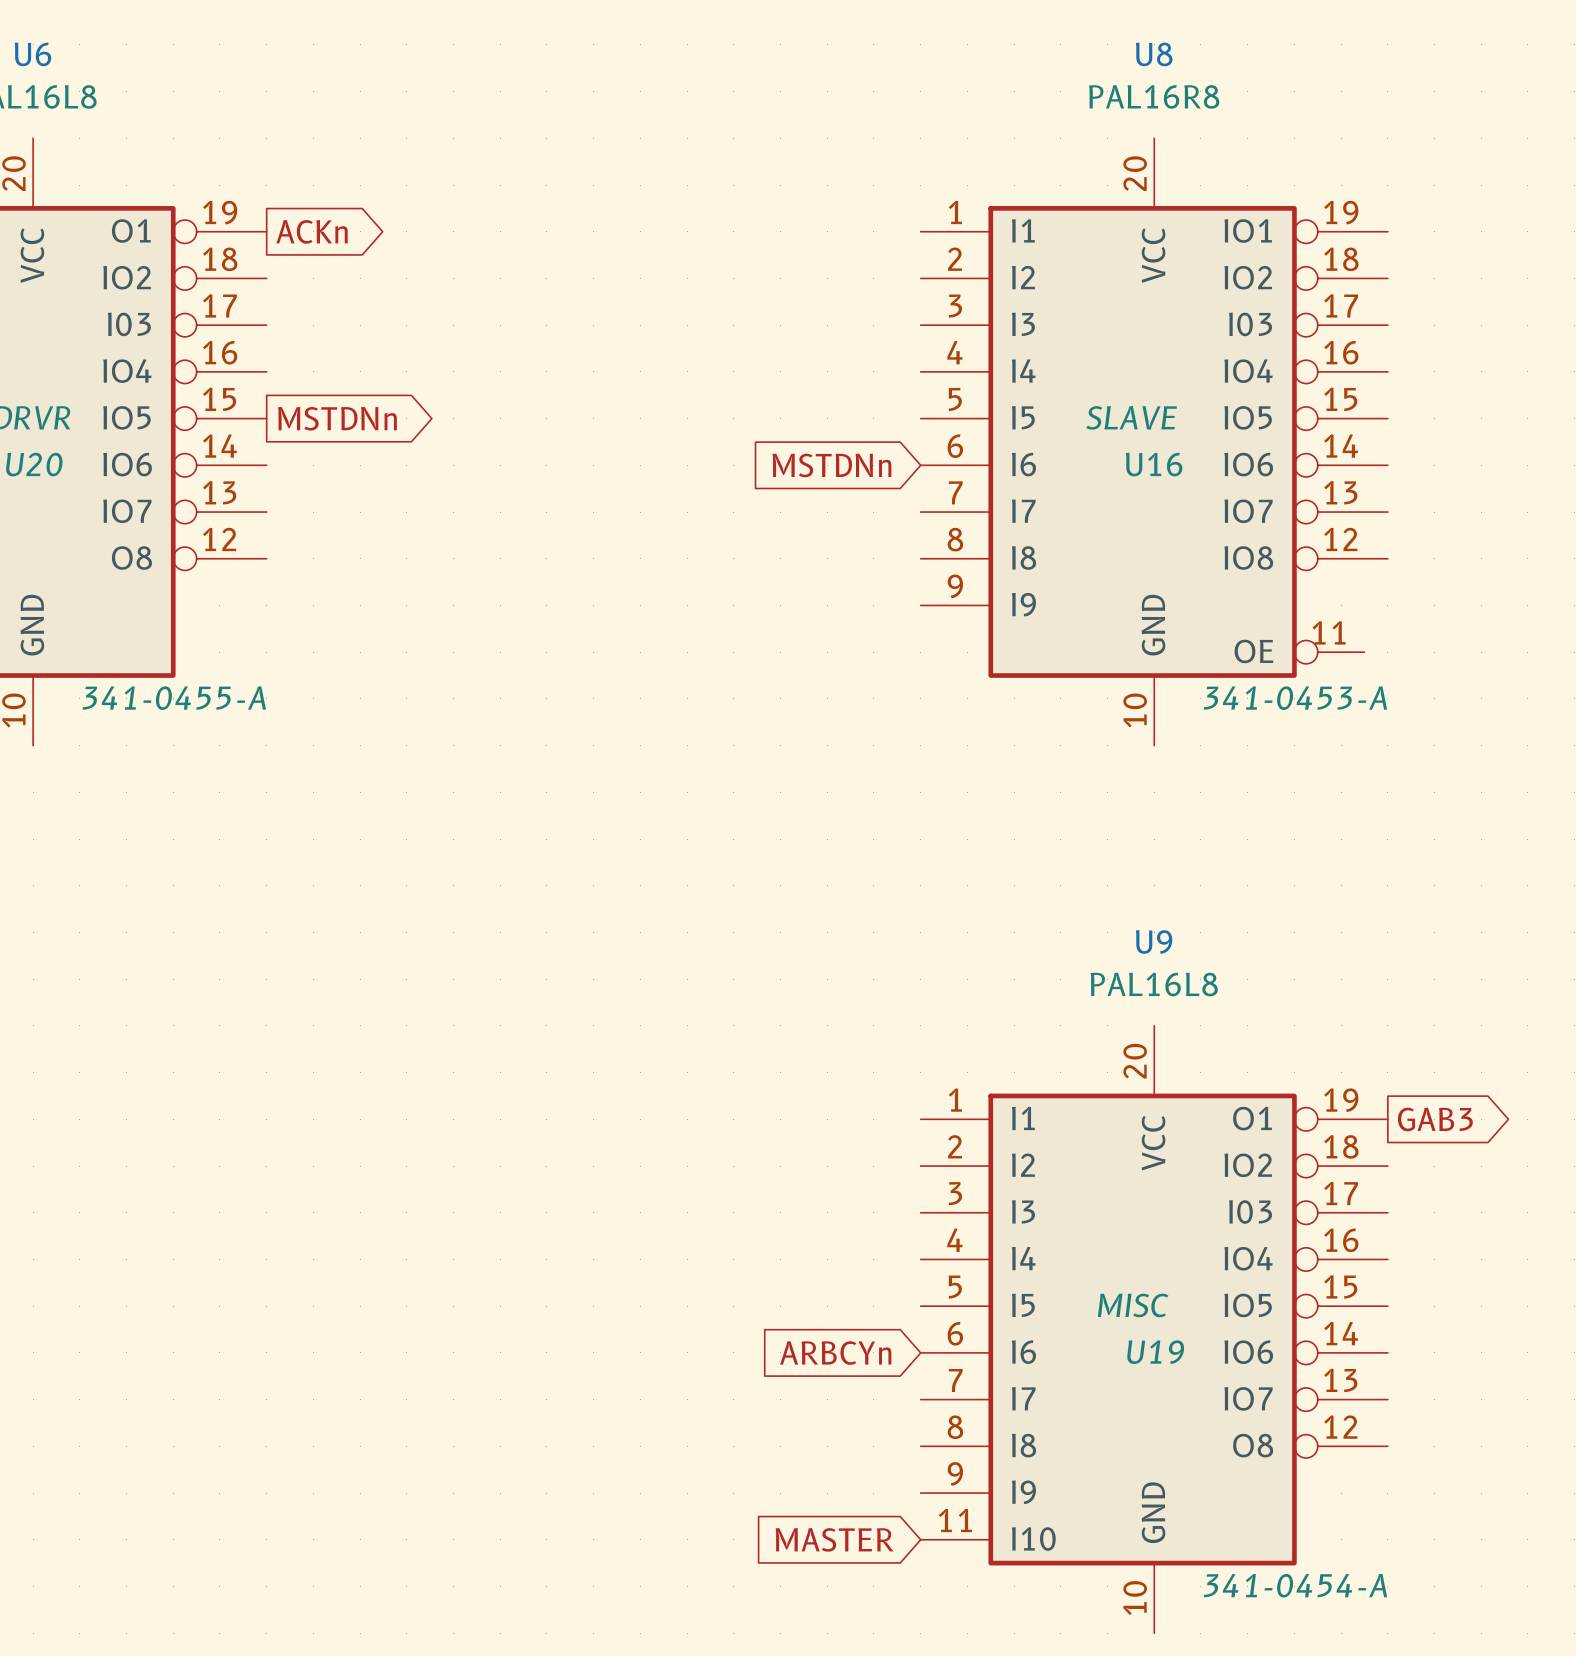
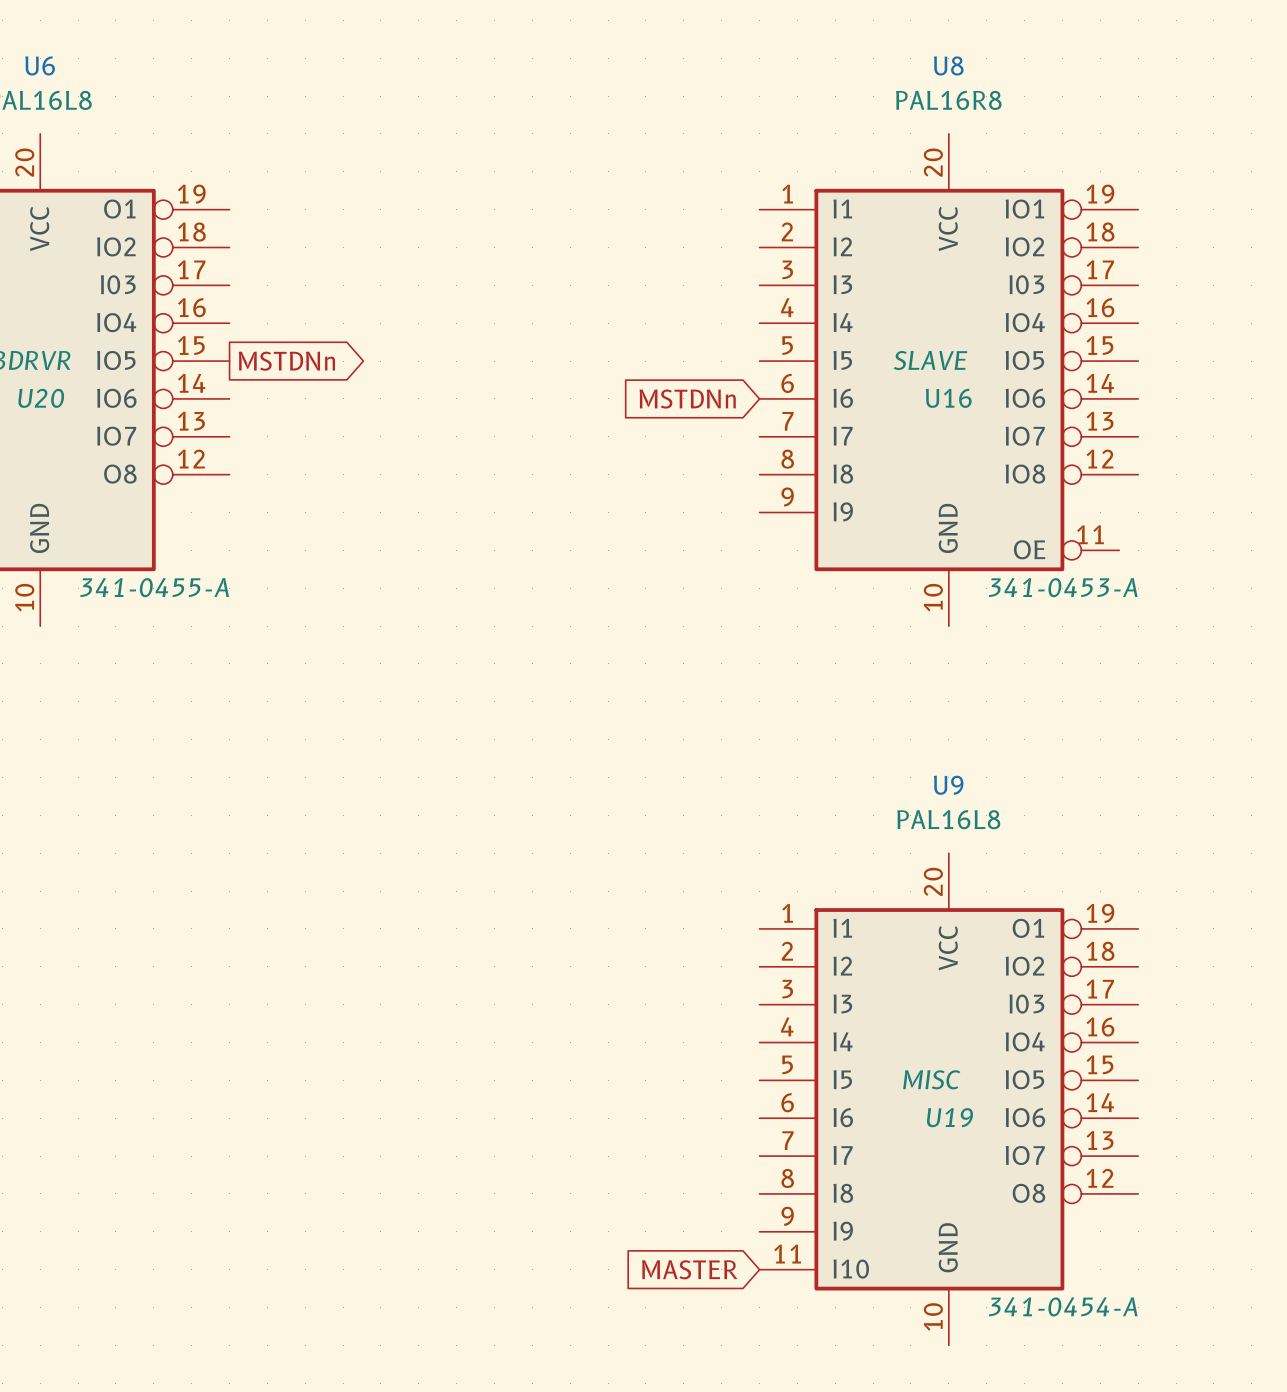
global label: ACKn (312, 231) -> none
global label: GAB3 (1435, 1119) -> none
global label: ARBCYn (835, 1353) -> none

